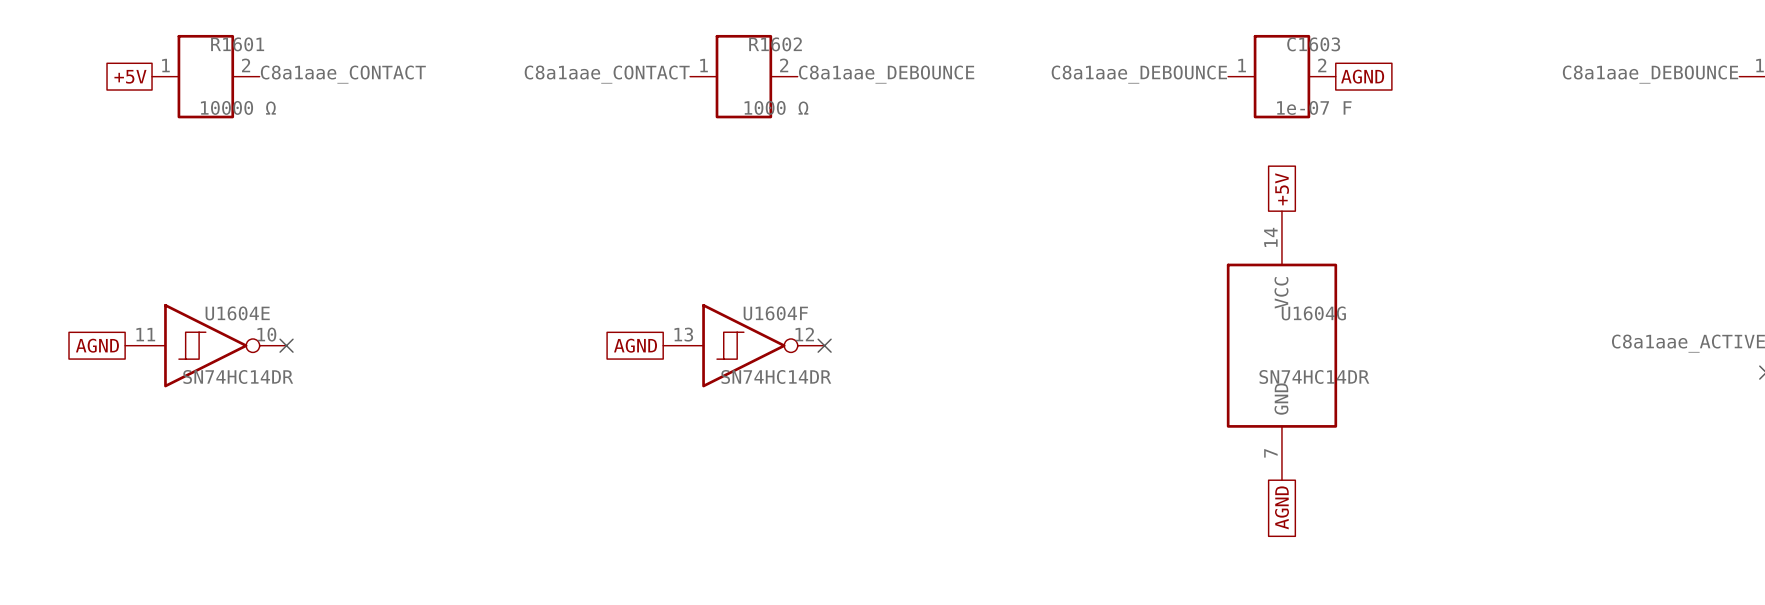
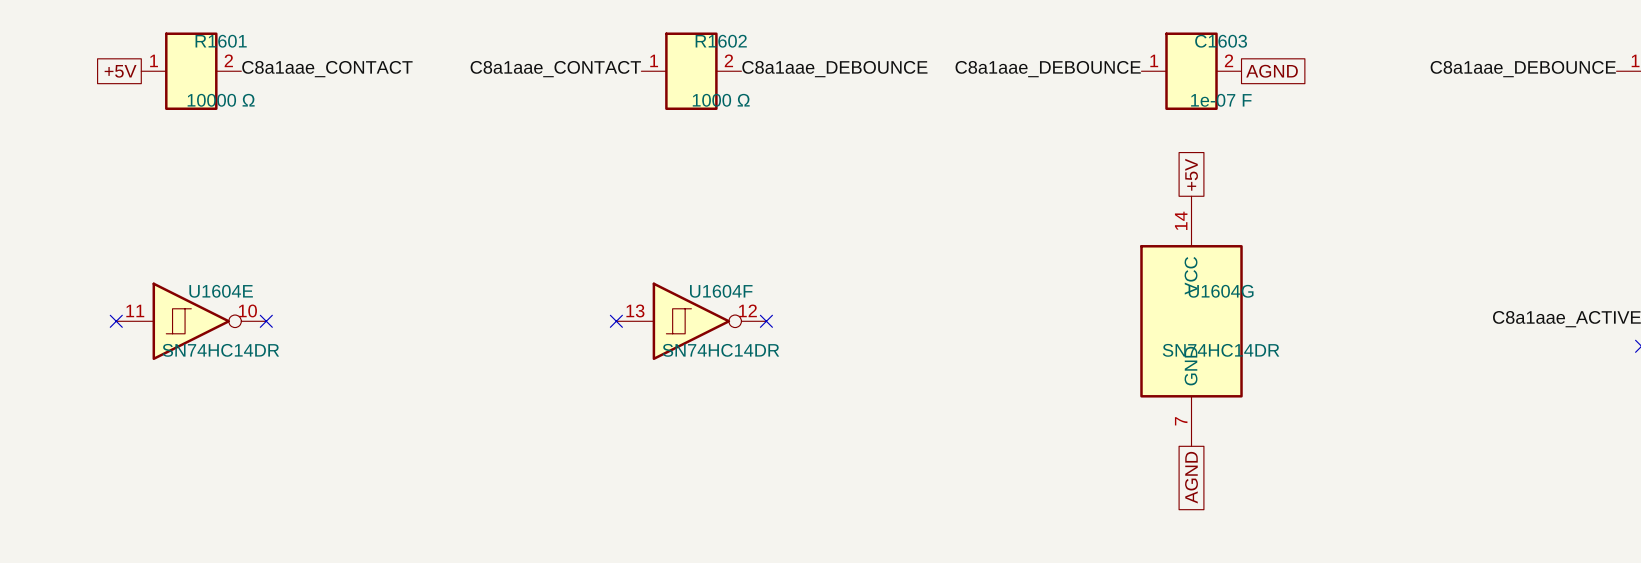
global label: AGND (97, 345) -> none
no-connect mark: none -> (116, 321)
global label: AGND (635, 345) -> none
no-connect mark: none -> (616, 321)

